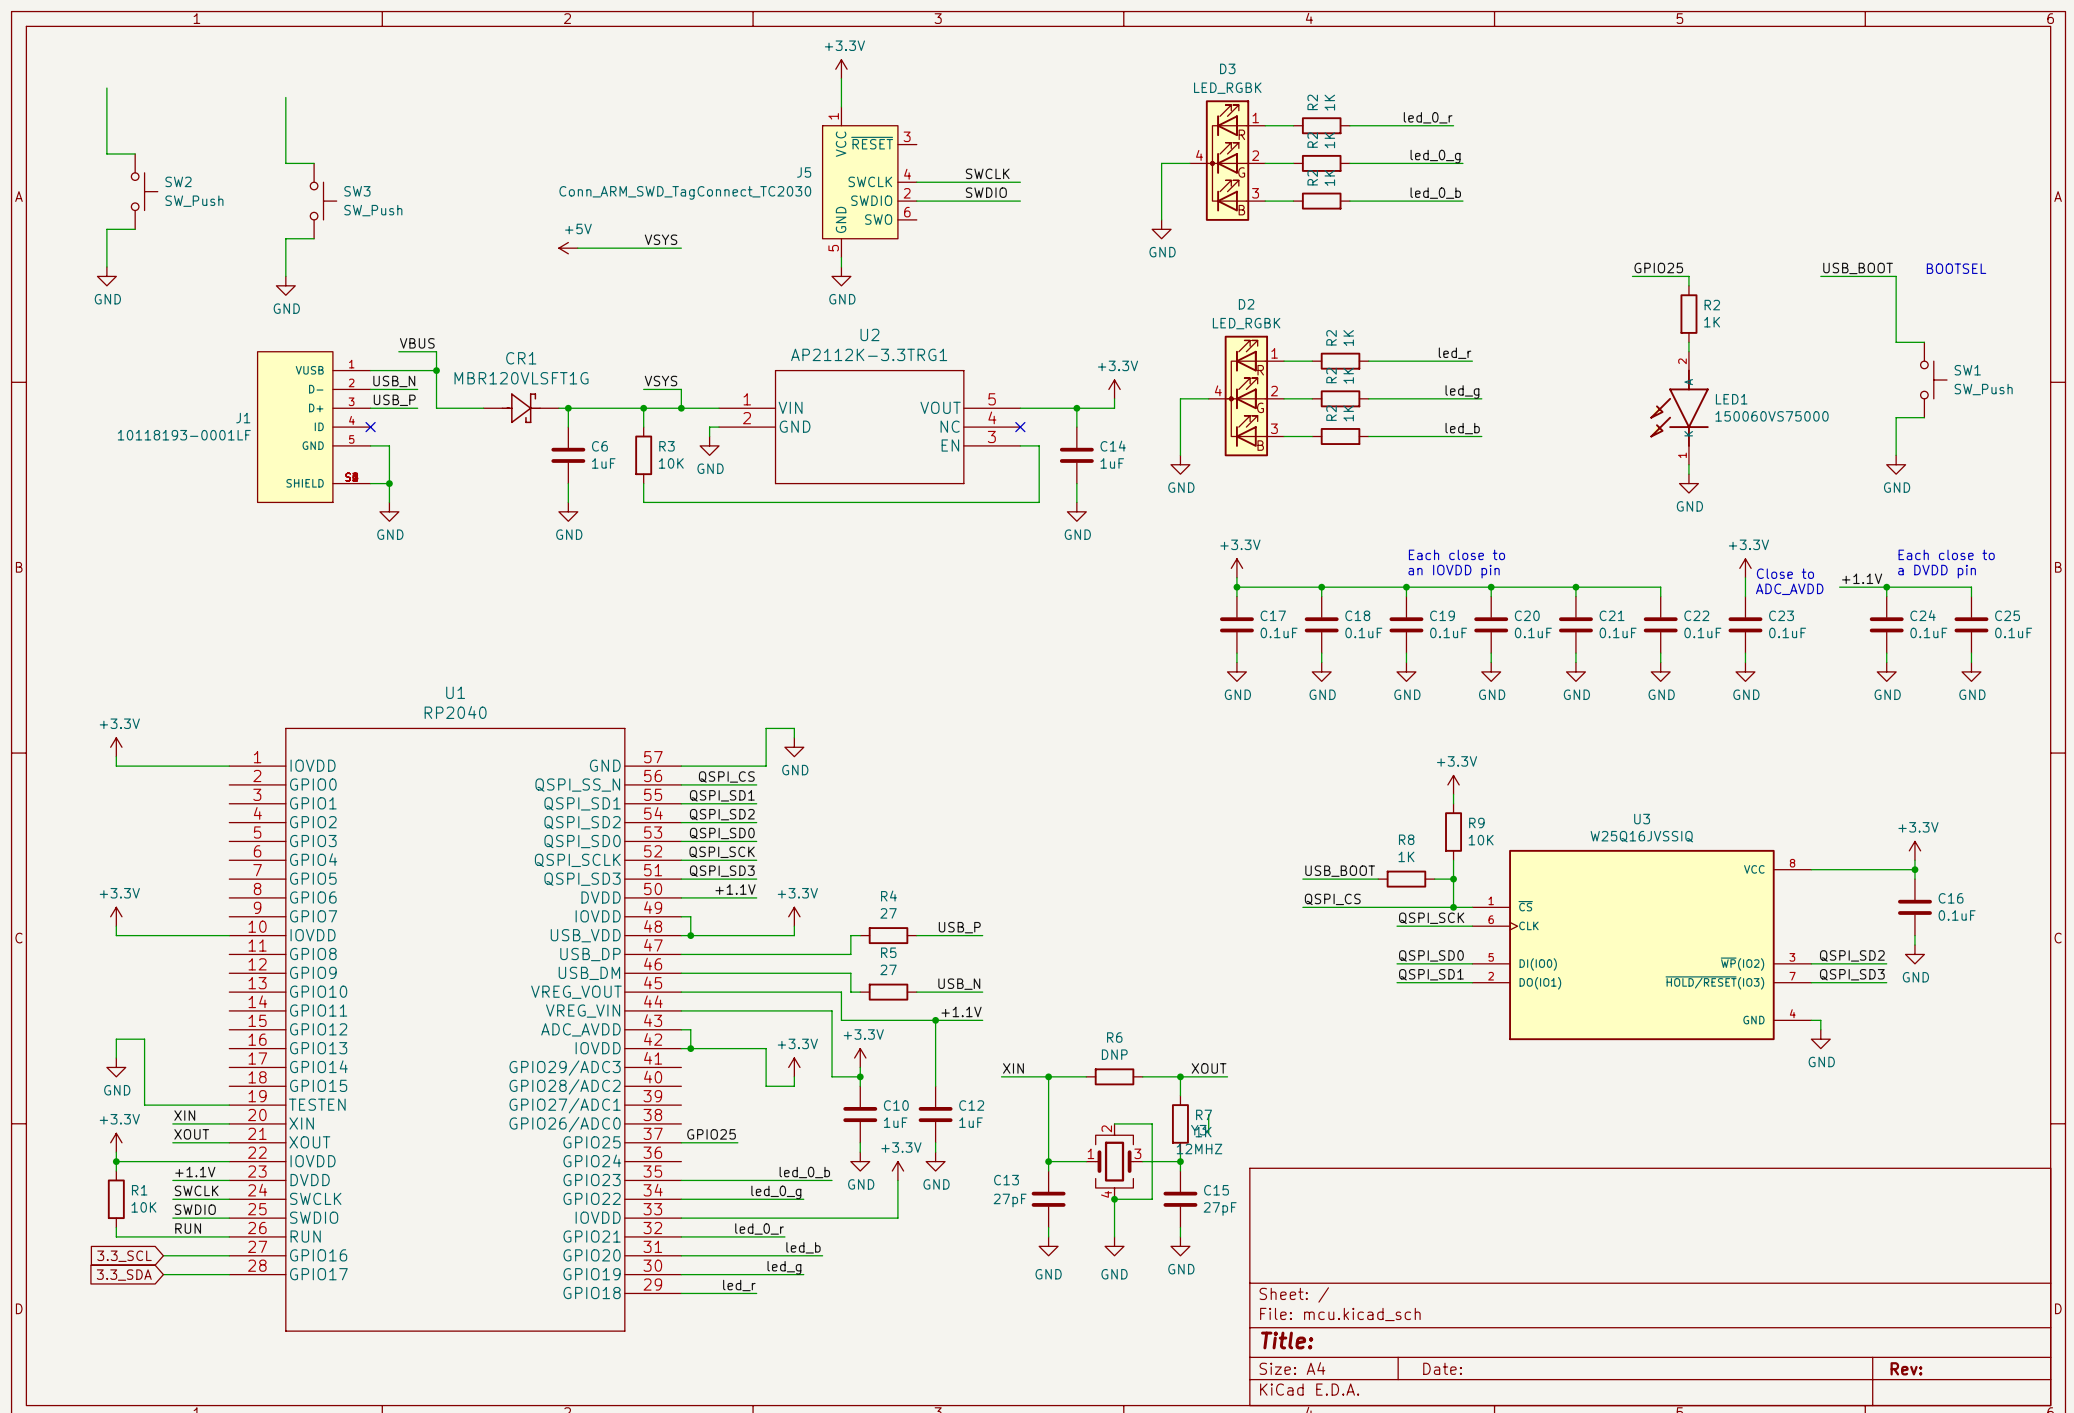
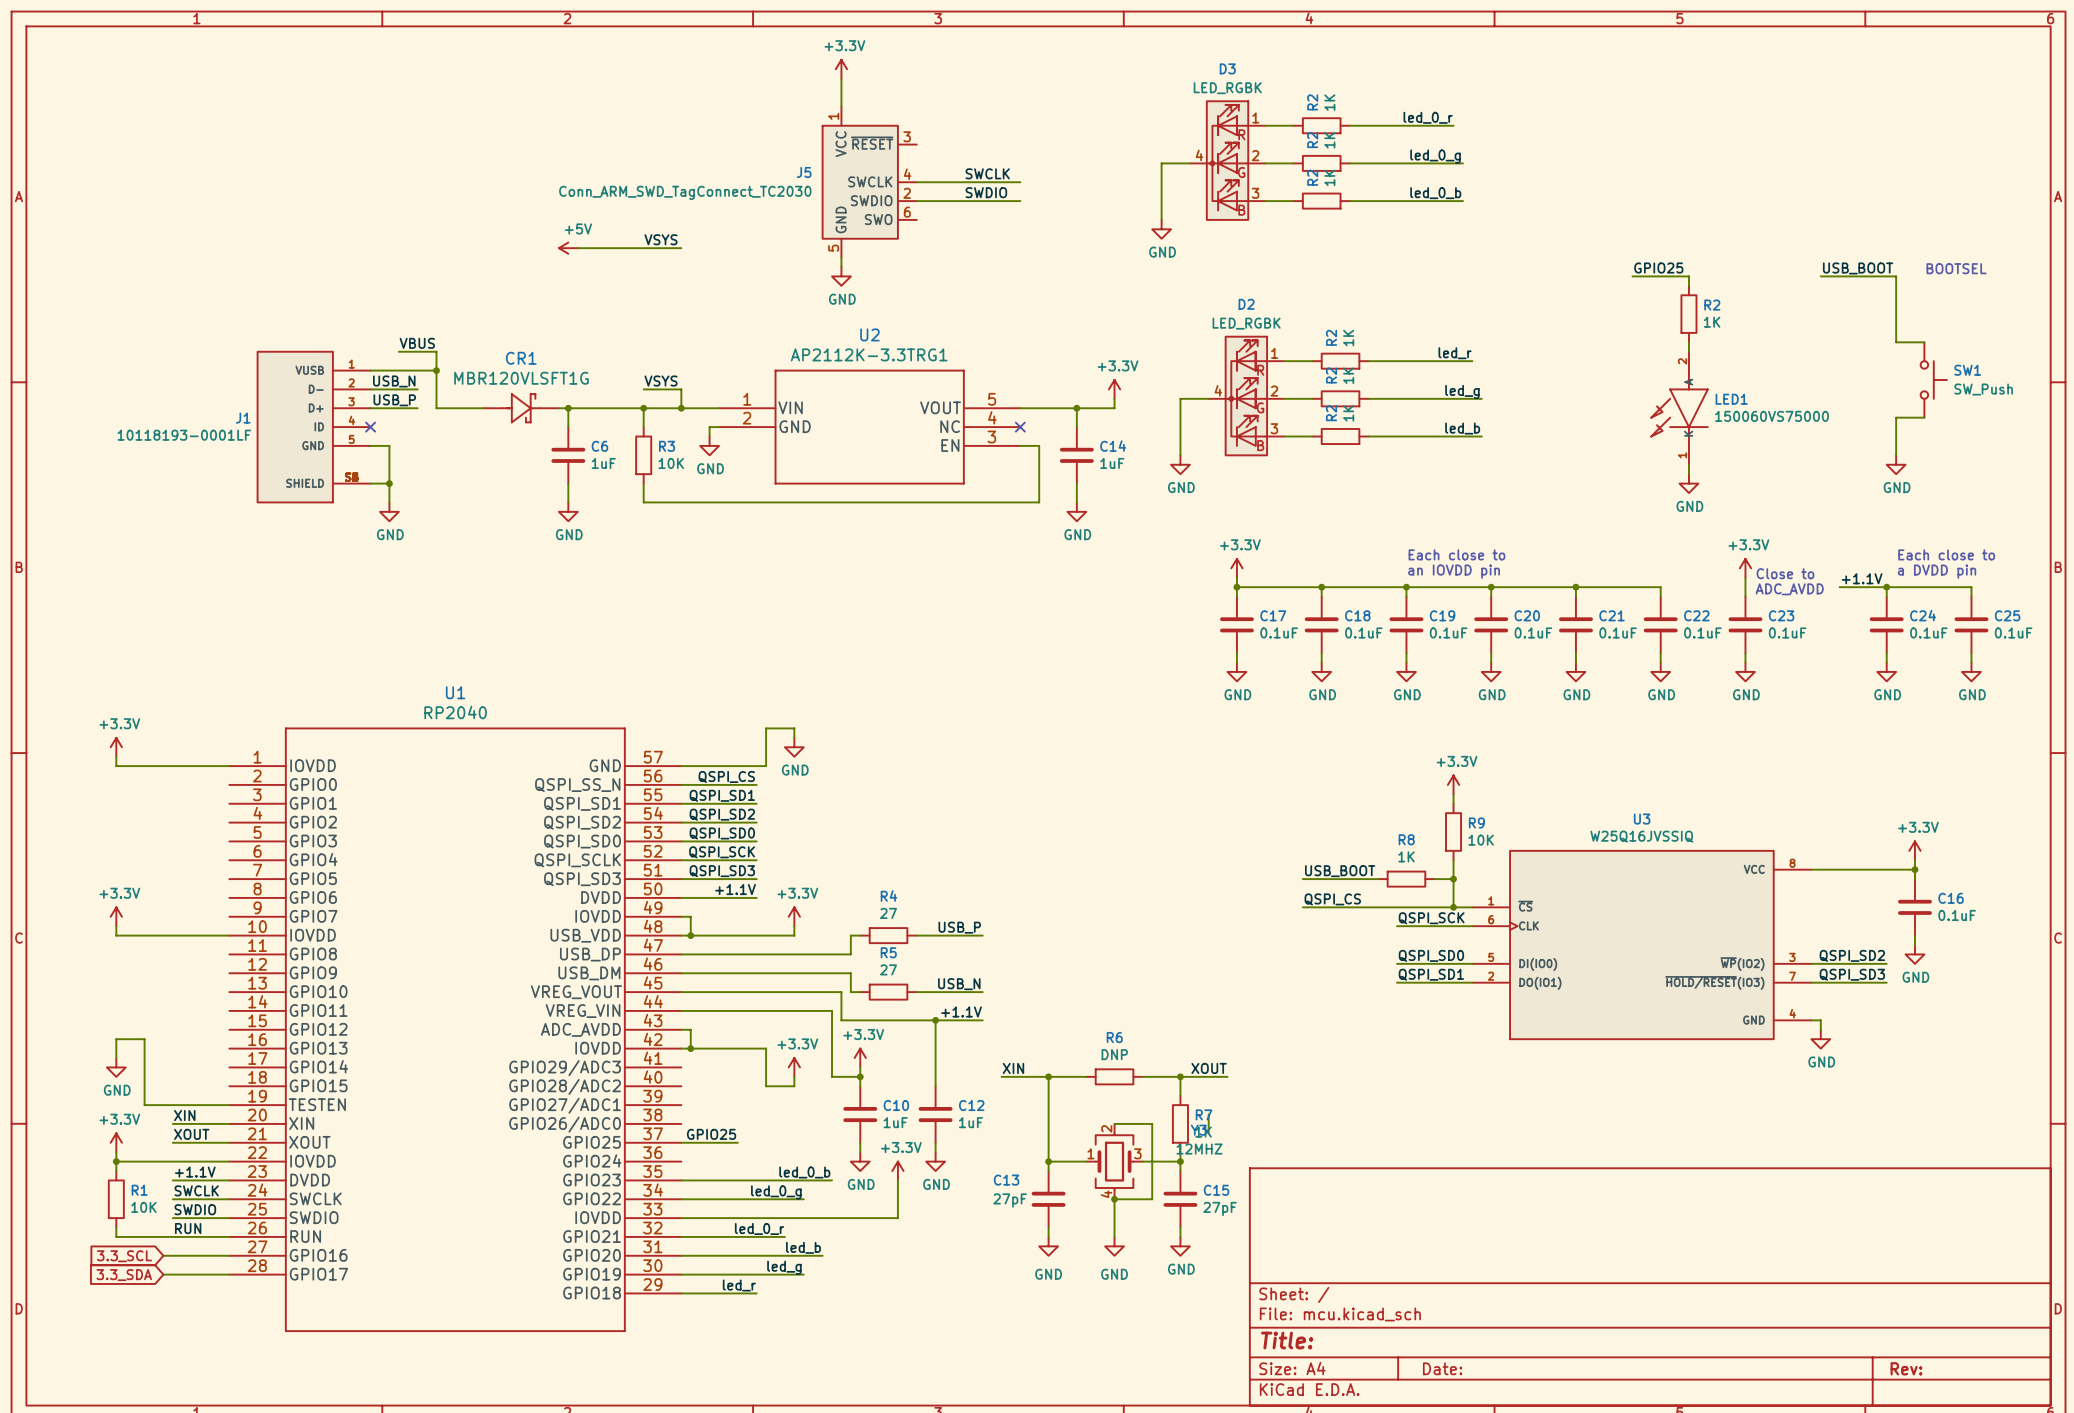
wire: (106, 88) (106, 153) (135, 153) -> none
wire: (285, 97) (285, 163) (314, 163) -> none
SW2: SW_Push (144, 191) -> none
SW3: SW_Push (323, 201) -> none
wire: (135, 229) (106, 229) (106, 267) -> none
wire: (314, 238) (285, 238) (285, 276) -> none
power symbol: GND (106, 276) -> none
power symbol: GND (285, 285) -> none

